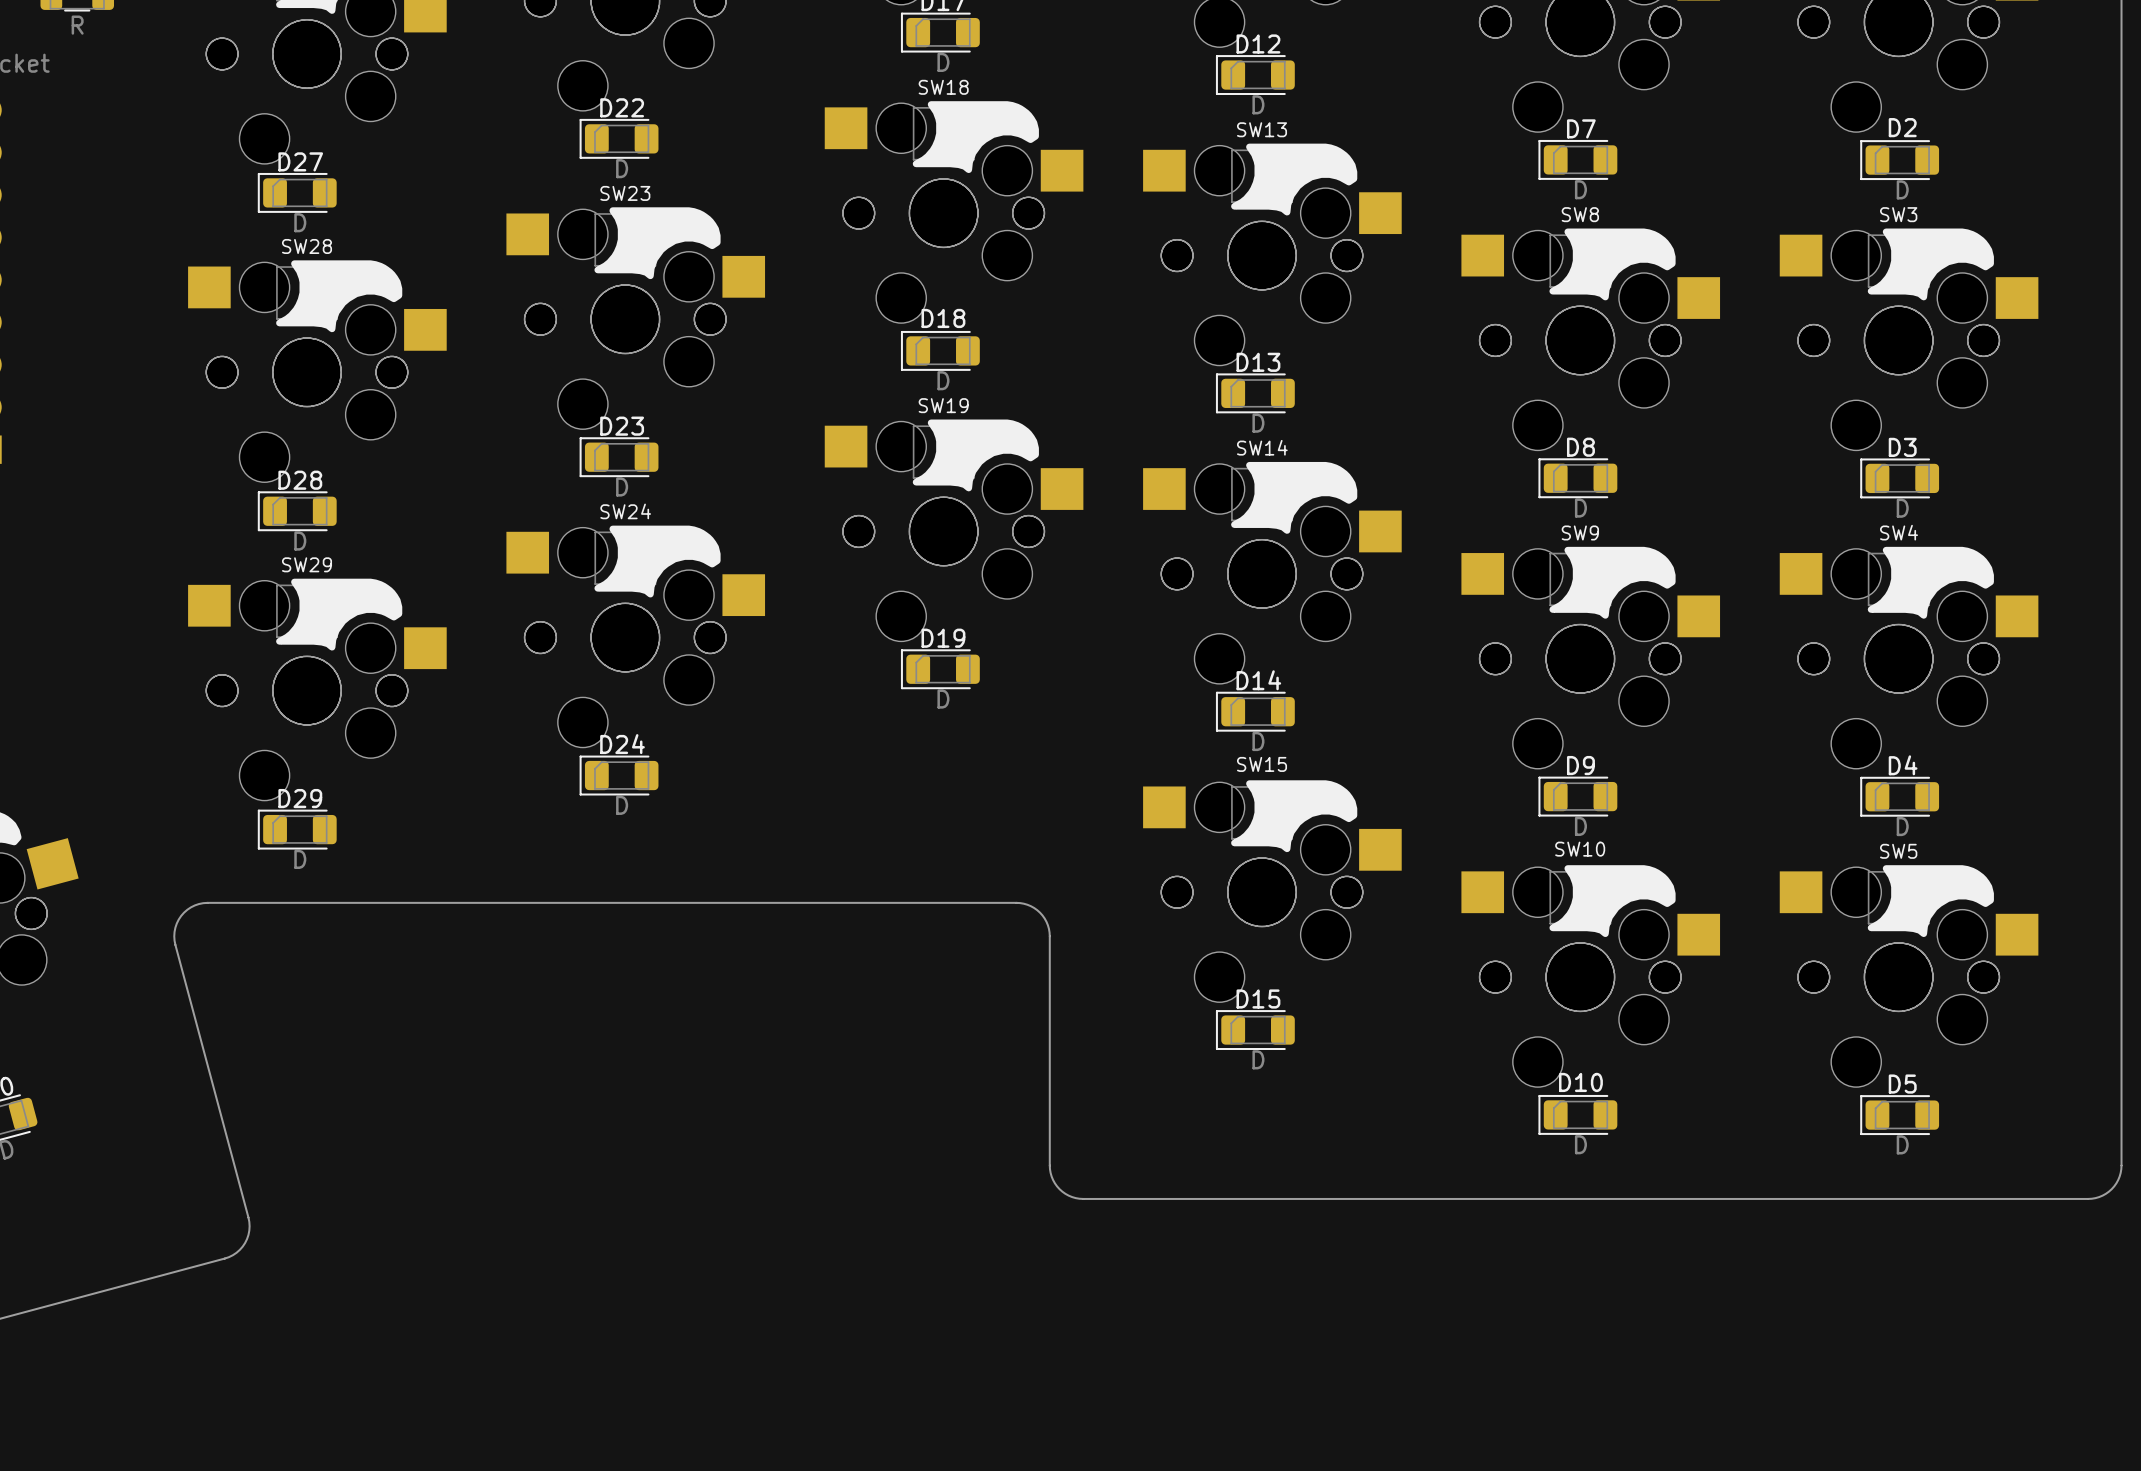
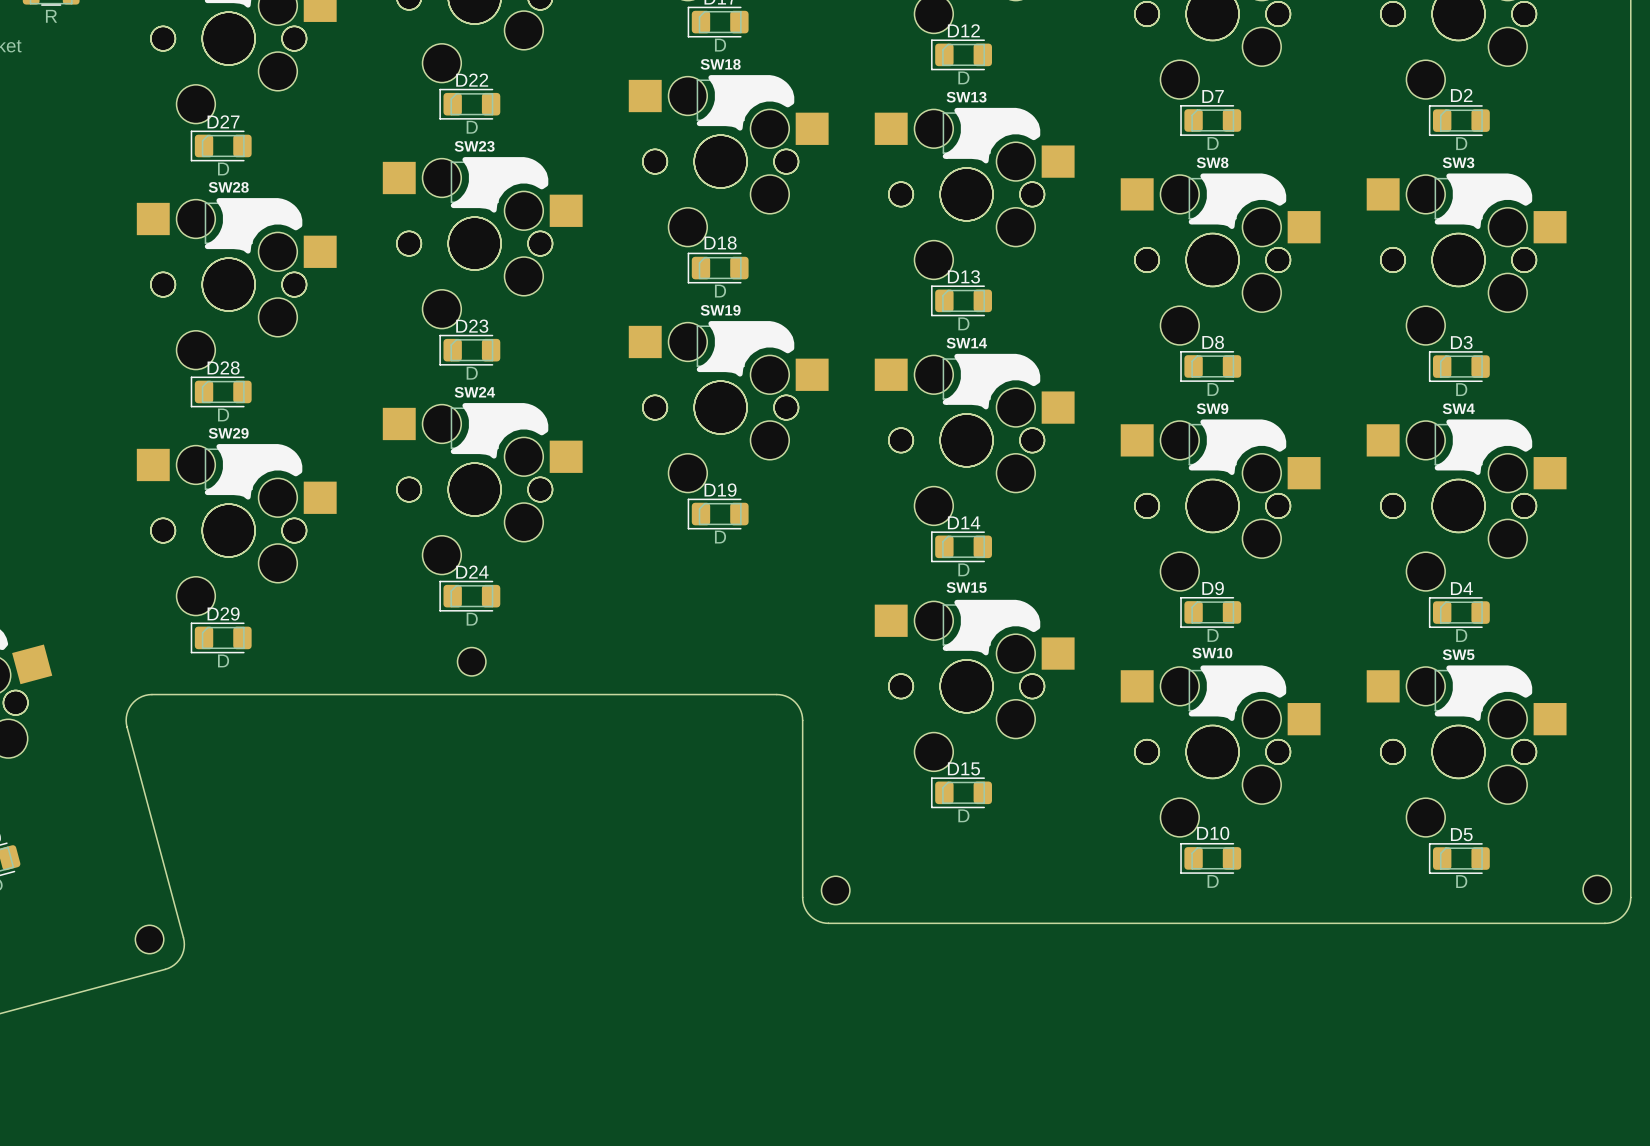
part: none -> (471, 661)
part: none -> (1597, 889)
part: none -> (835, 890)
part: none -> (149, 939)

